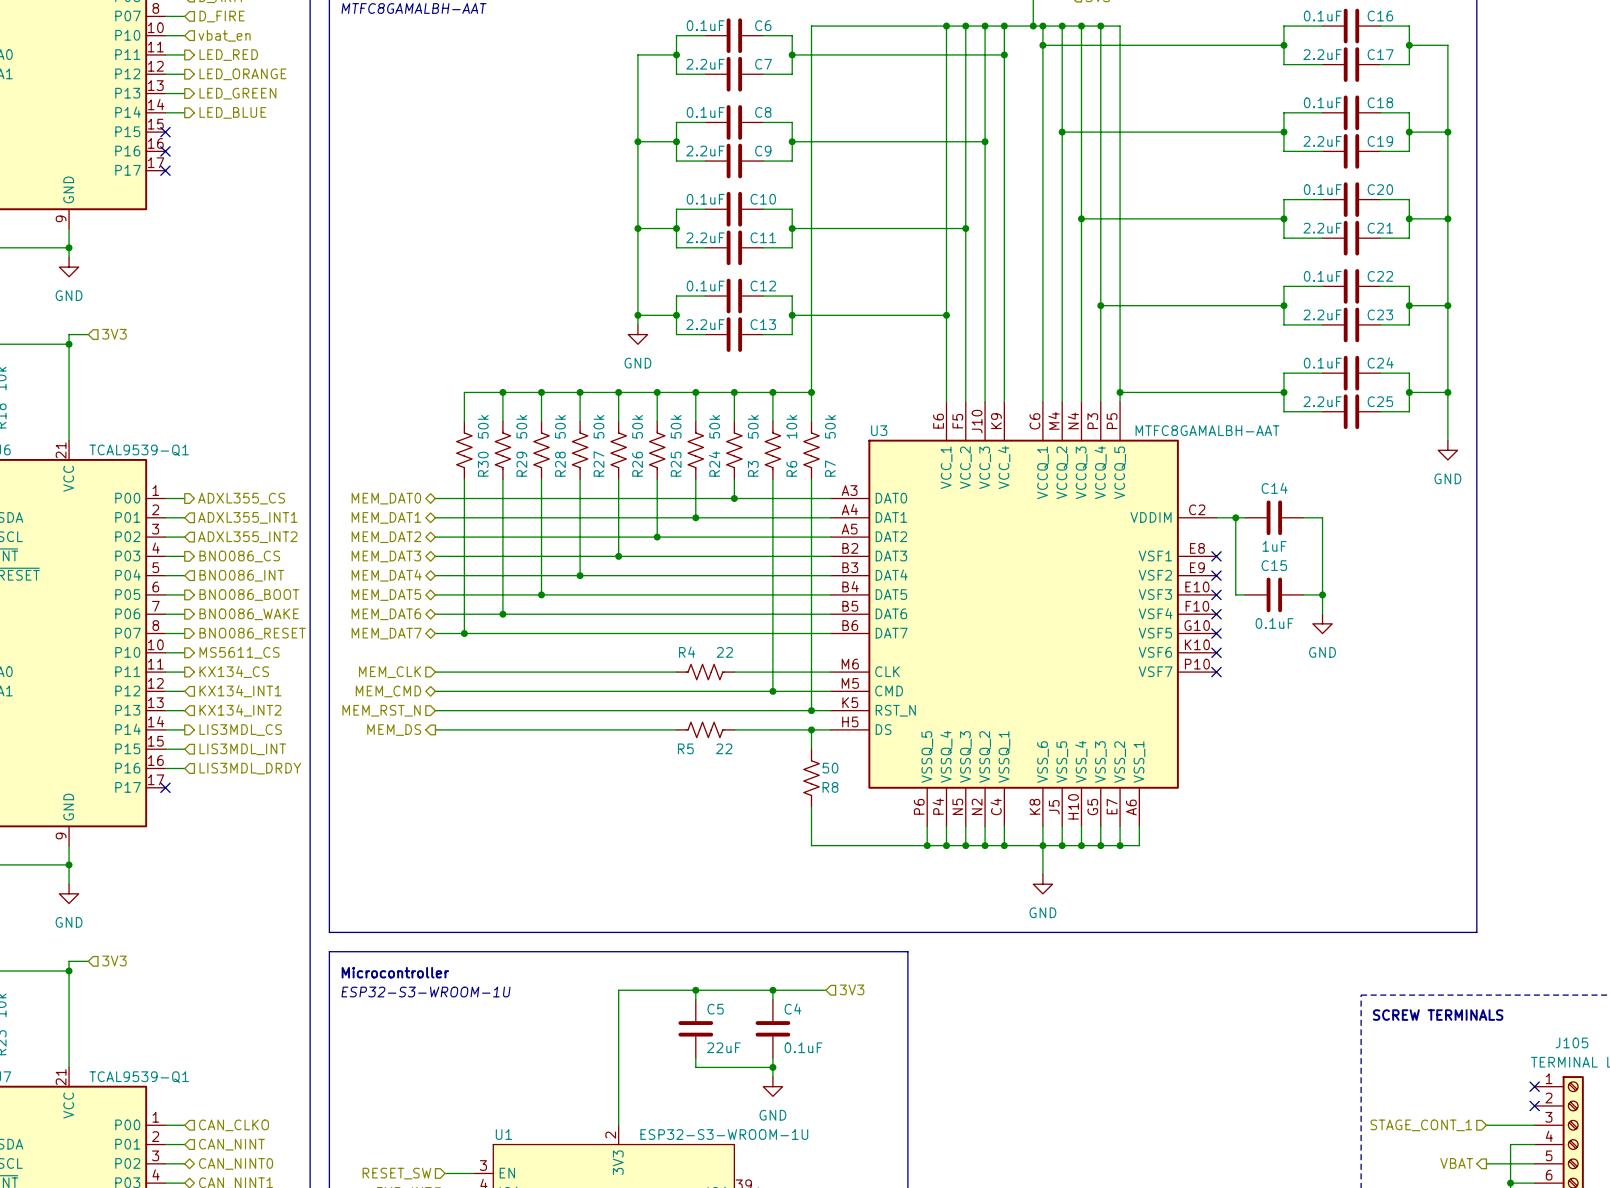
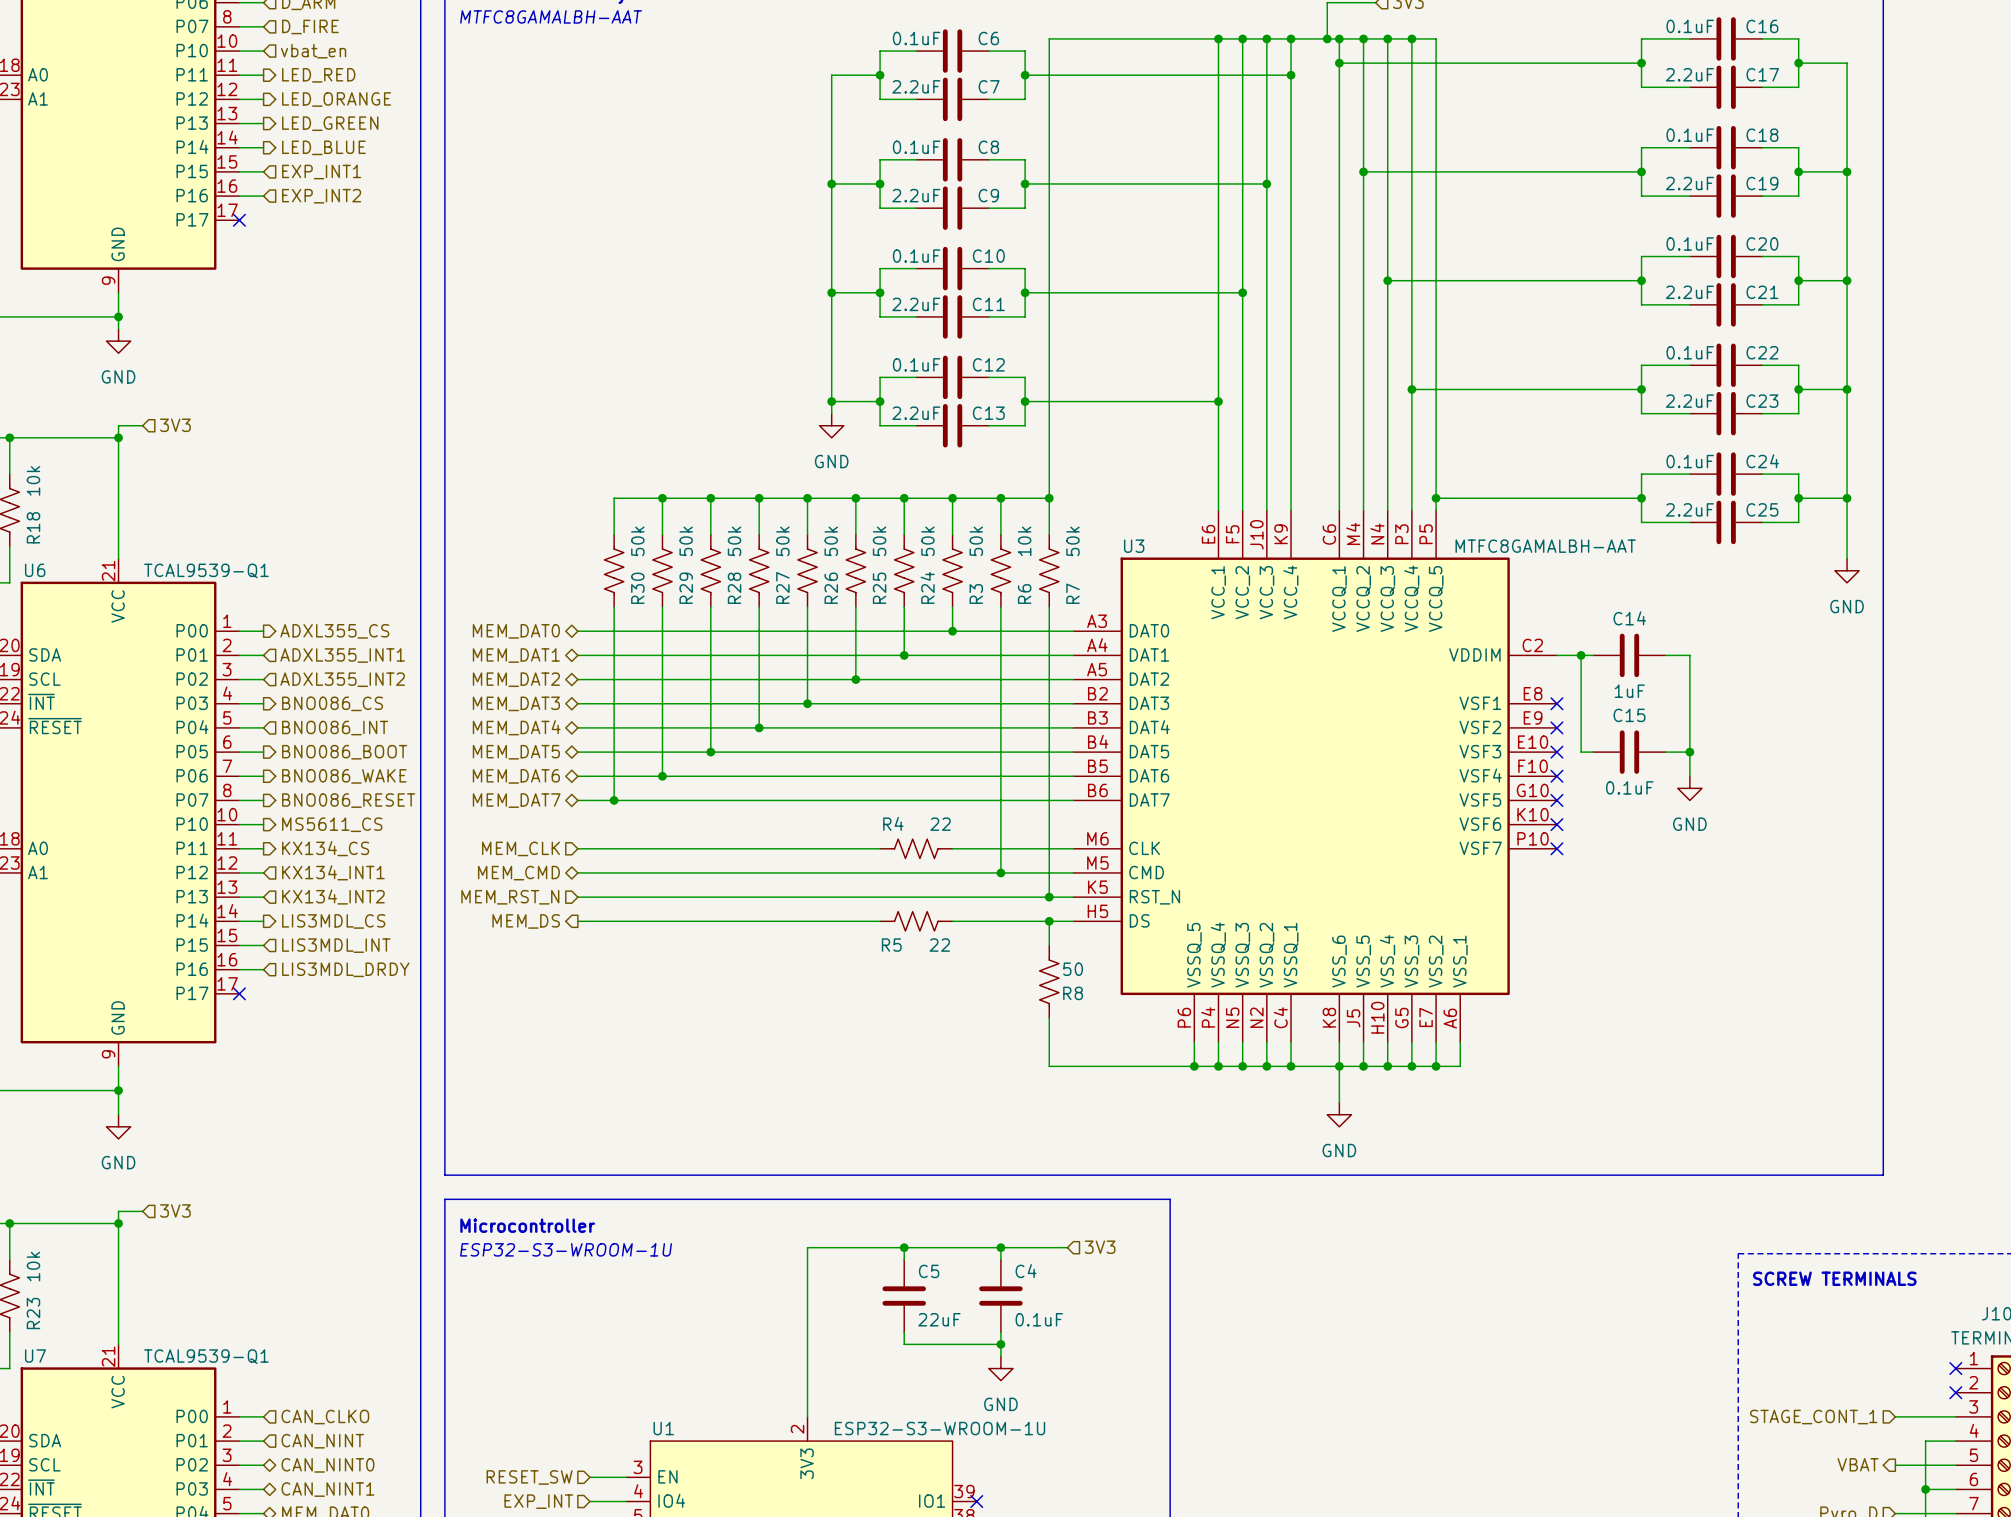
wire: none -> (239, 171) (263, 171)
no-connect mark: (165, 132) -> none
hierarchical label: none -> EXP_INT1 (321, 172)
wire: none -> (239, 196) (263, 196)
no-connect mark: (165, 151) -> none
hierarchical label: none -> EXP_INT2 (321, 196)

